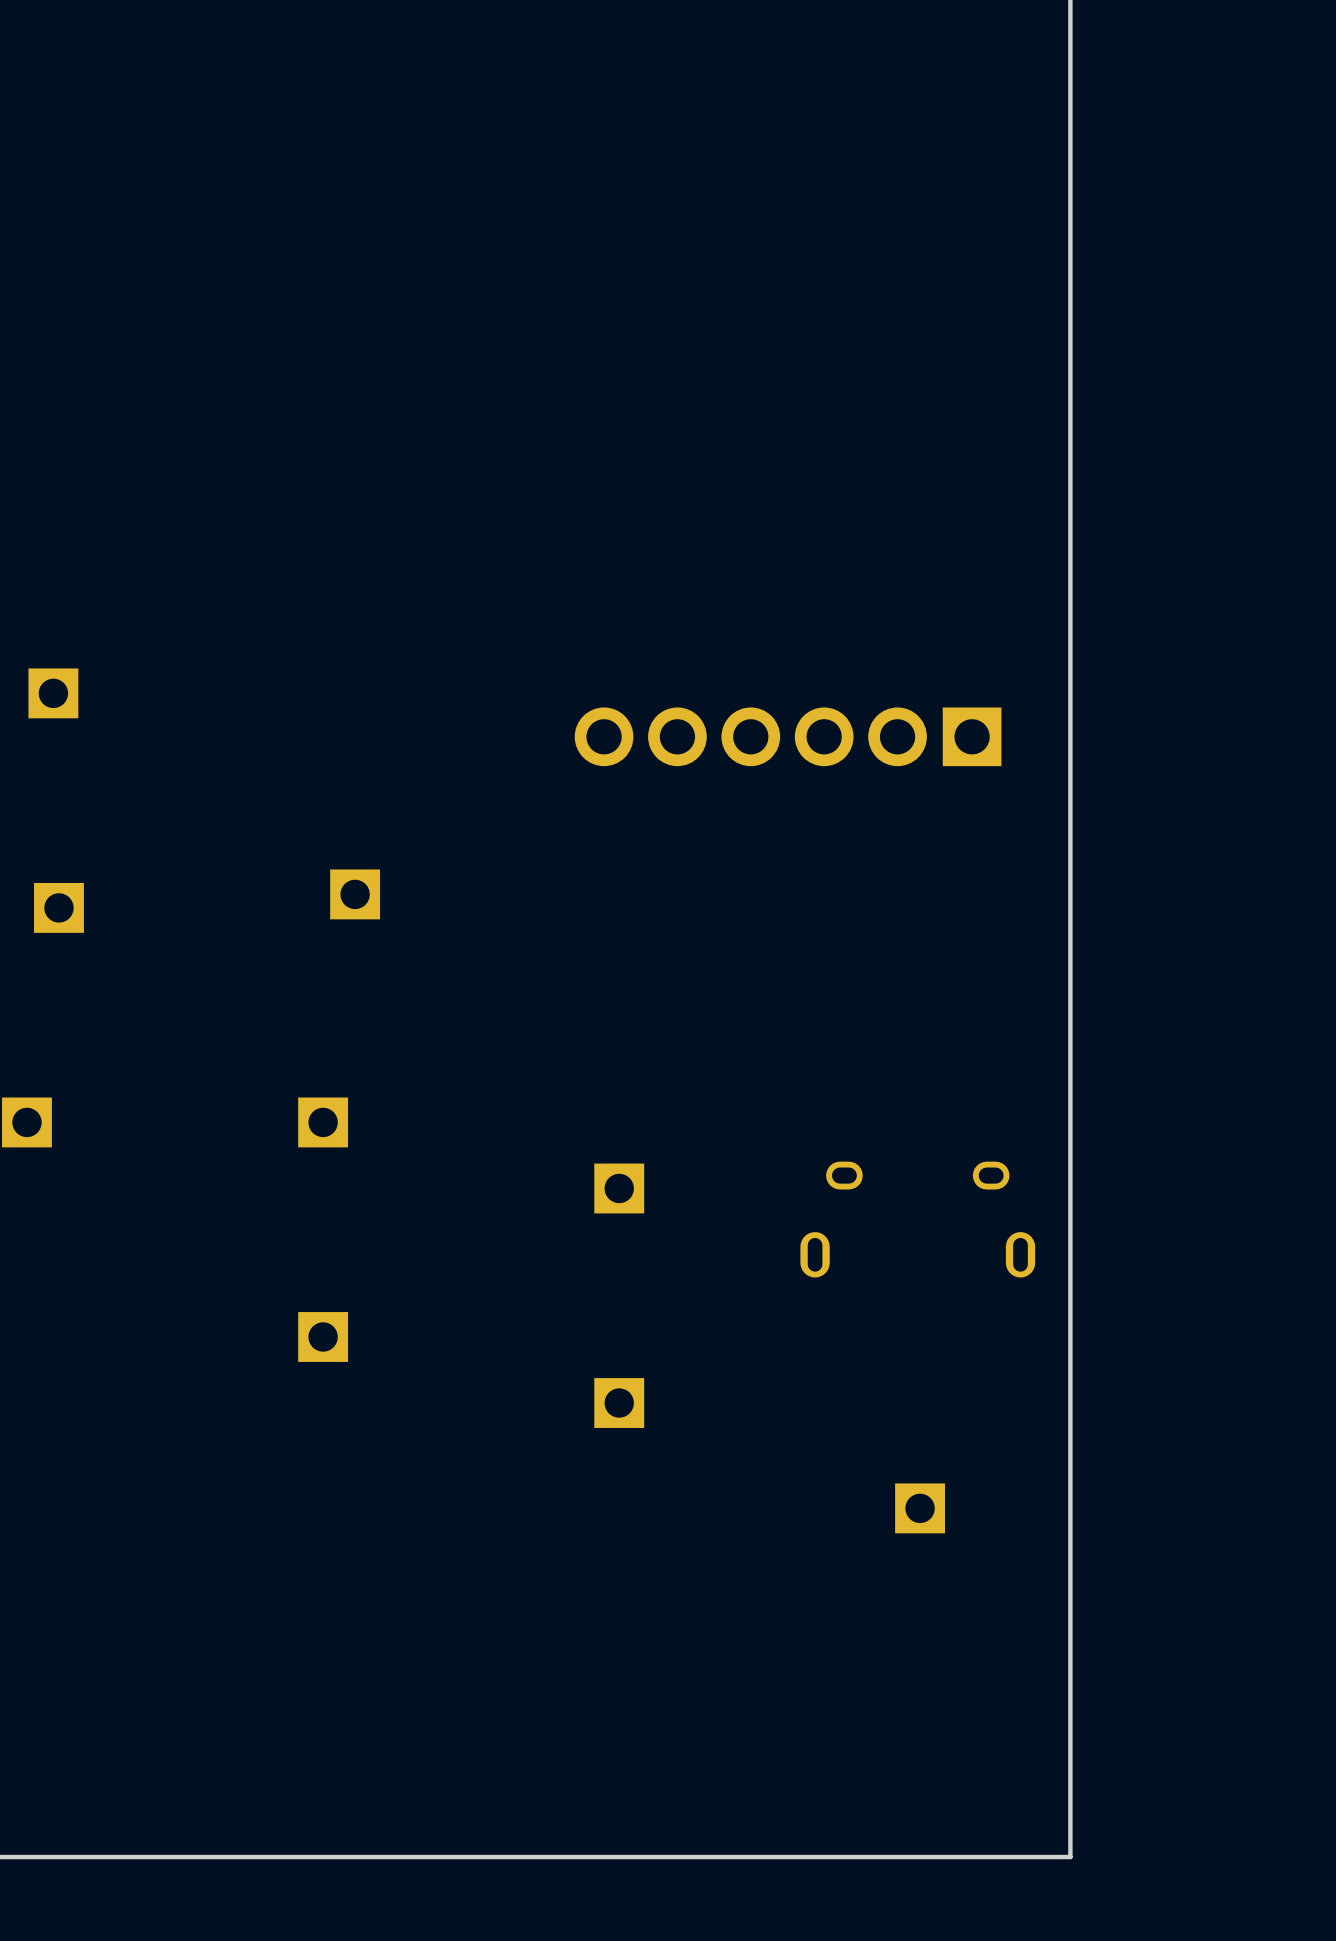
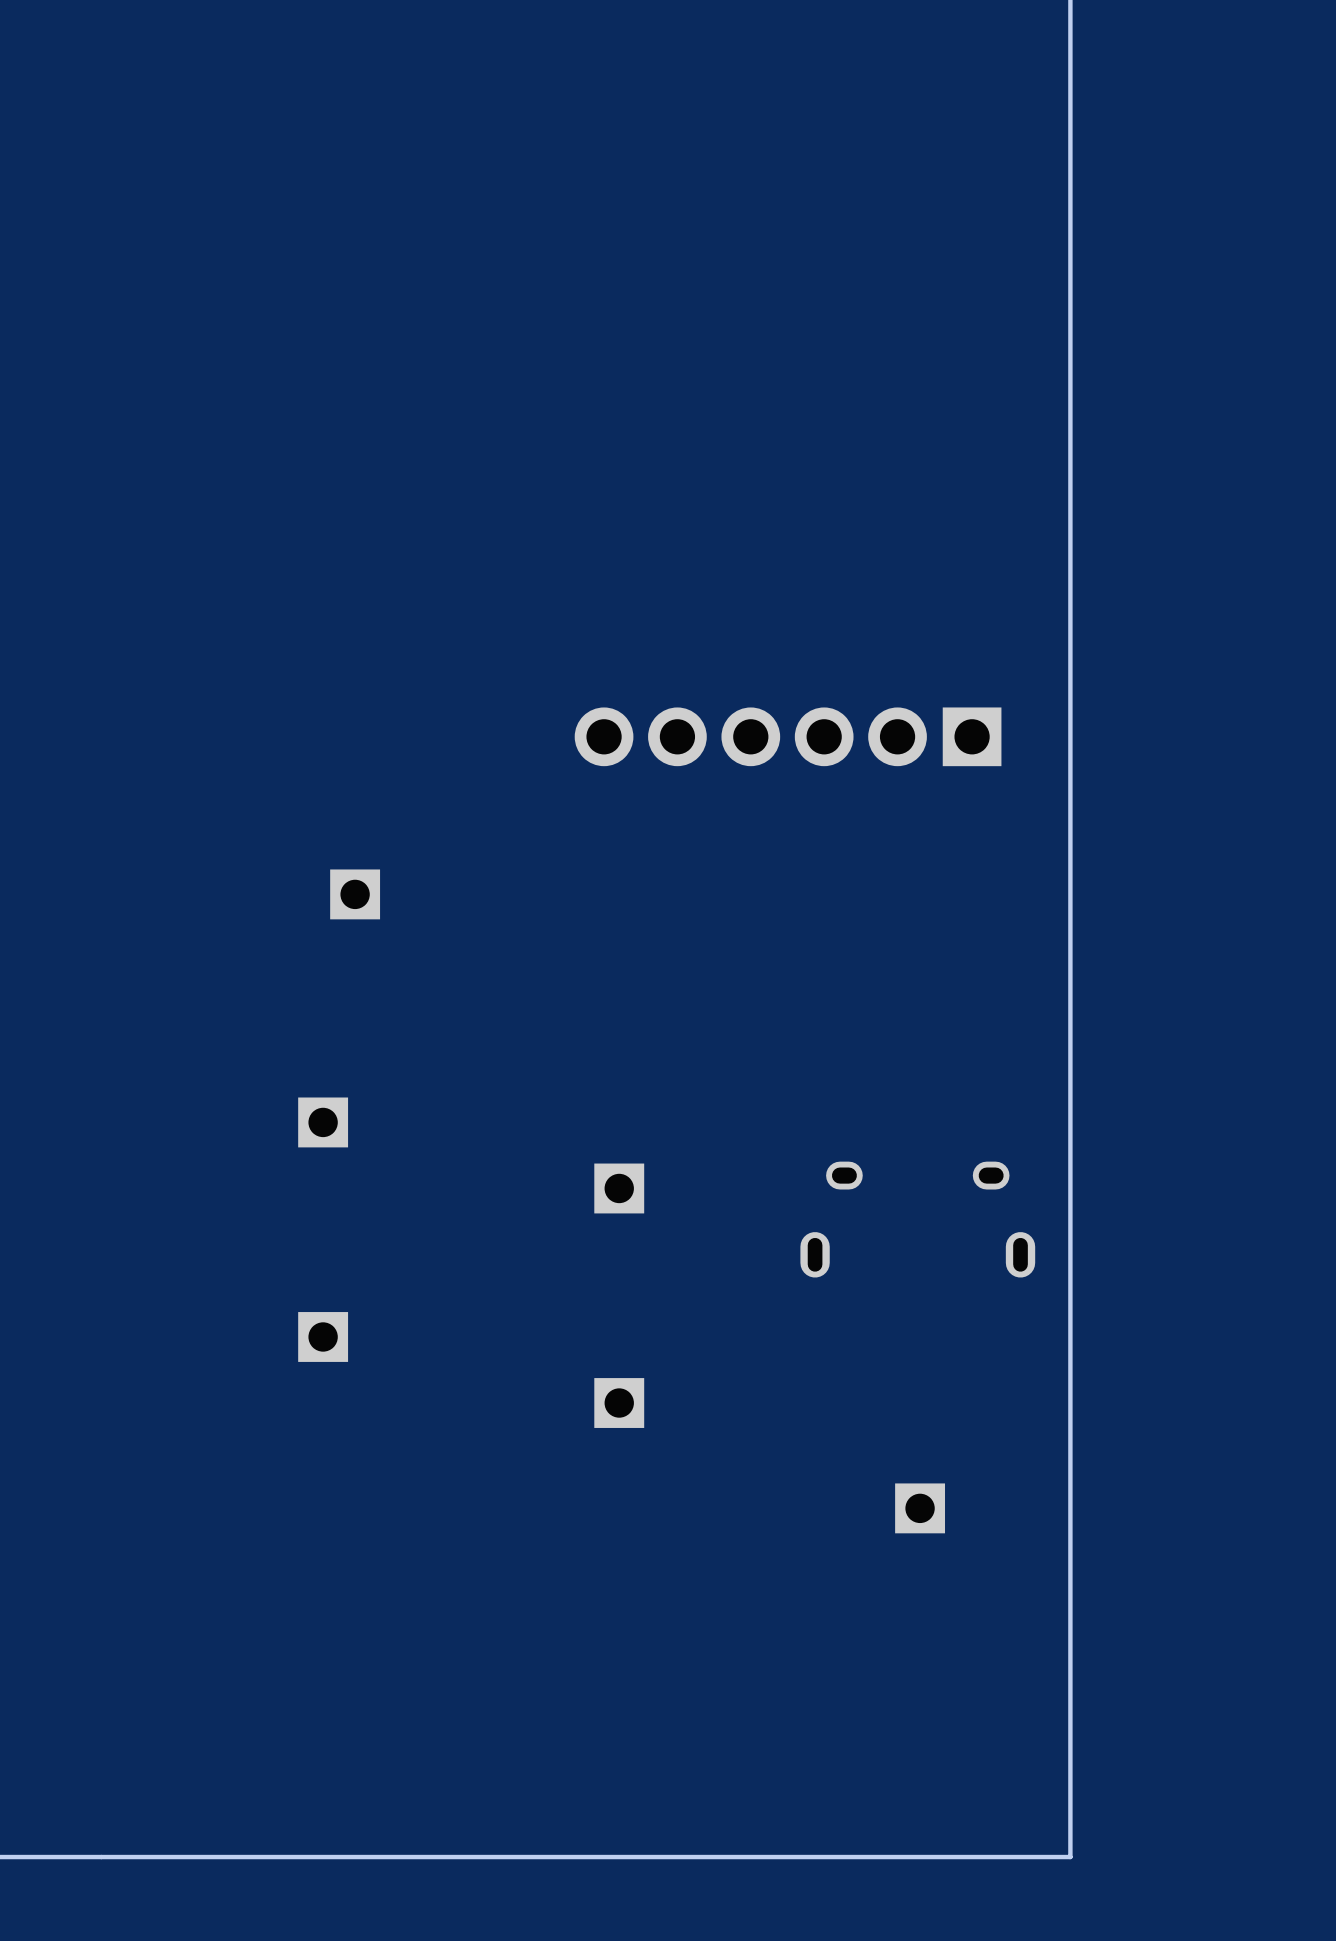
part: (53, 693) -> none
part: (58, 907) -> none
part: (26, 1122) -> none

